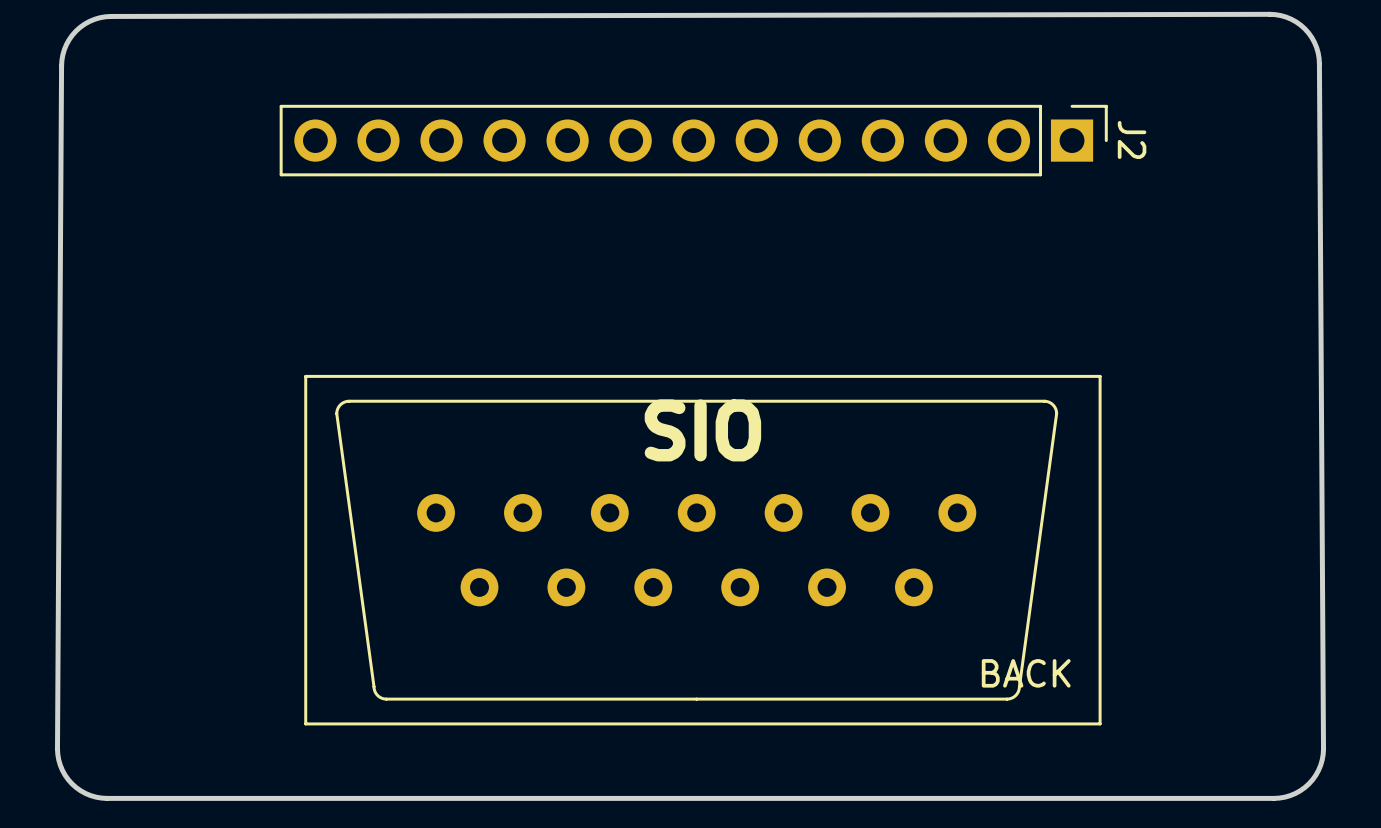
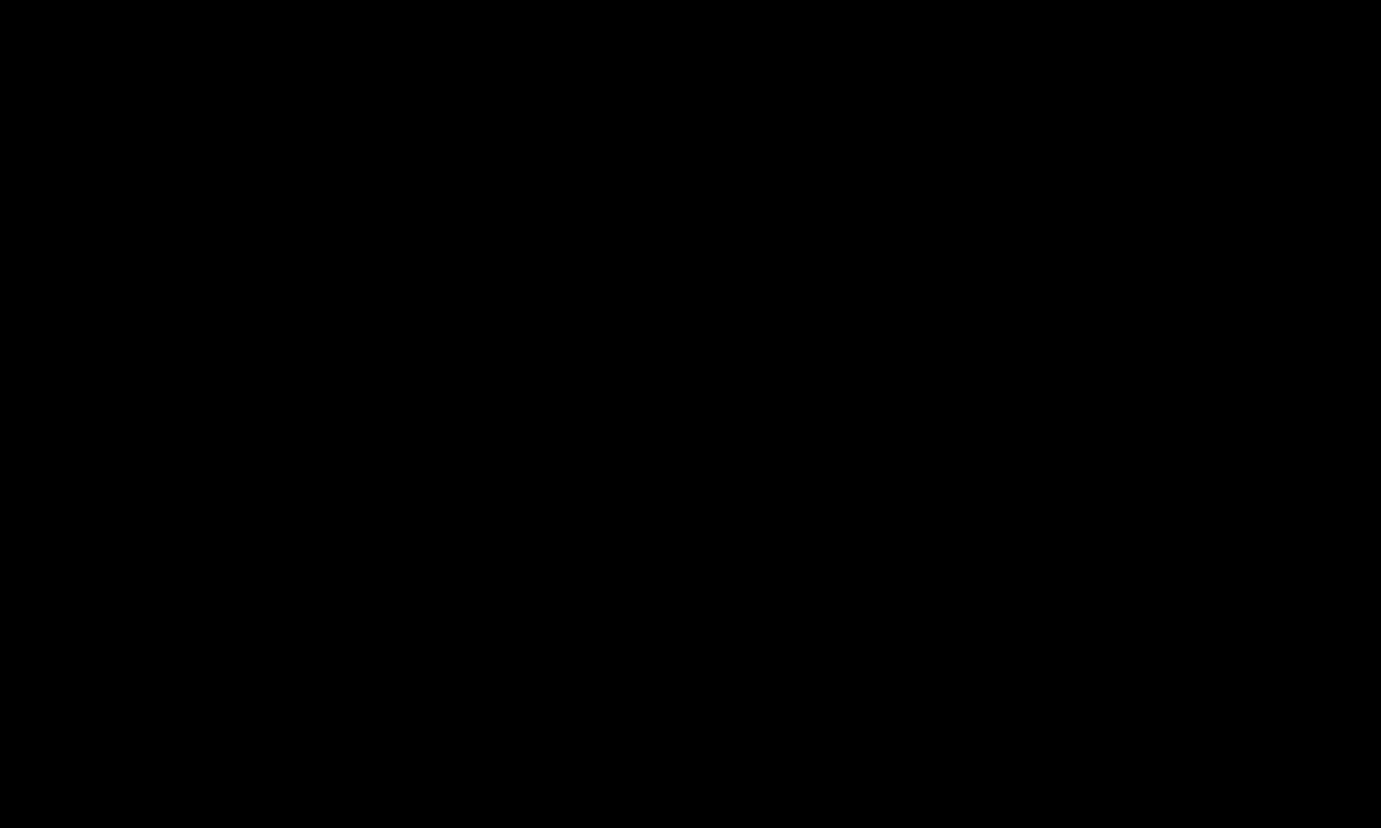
board edge: (1269, 14) (111, 16) (94, 19) (84, 24) (76, 31) (66, 44) (61, 66) (57, 748) (60, 765) (65, 775) (80, 790) (90, 795) (107, 798) (1273, 798) (1284, 797) (1300, 790) (1308, 783) (1318, 770) (1323, 748) (1319, 63) (1314, 42) (1304, 28) (1291, 19) (1280, 15) (1275, 14) (1269, 14) -> none
J2: (693, 140) -> none
part: (702, 550) -> none

